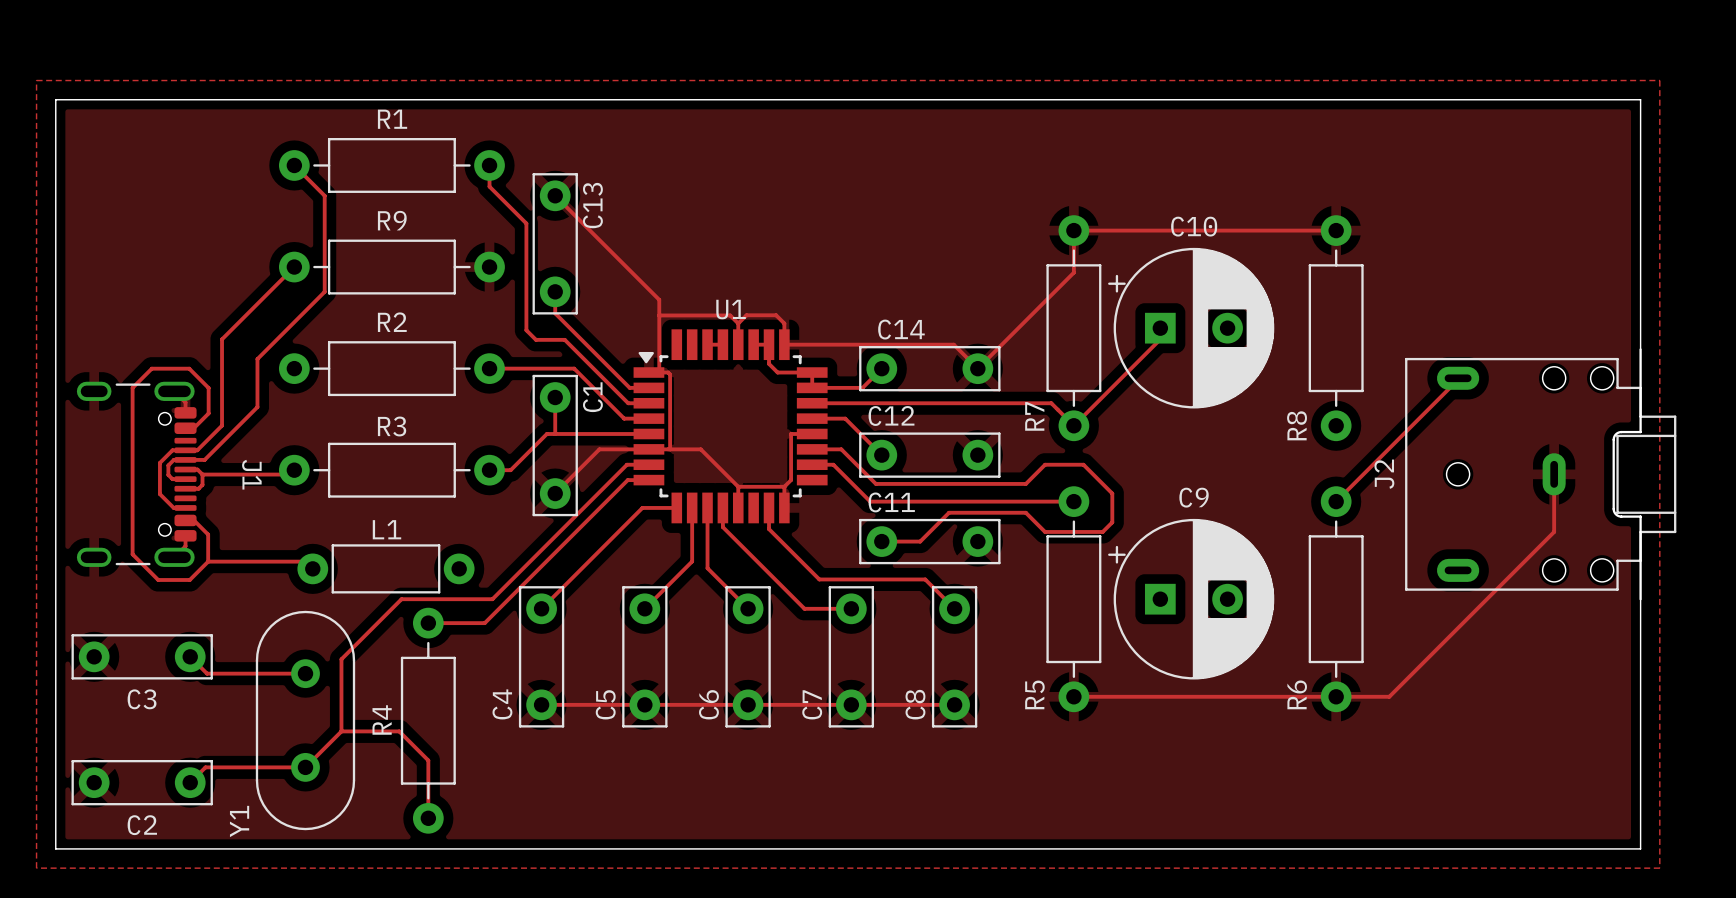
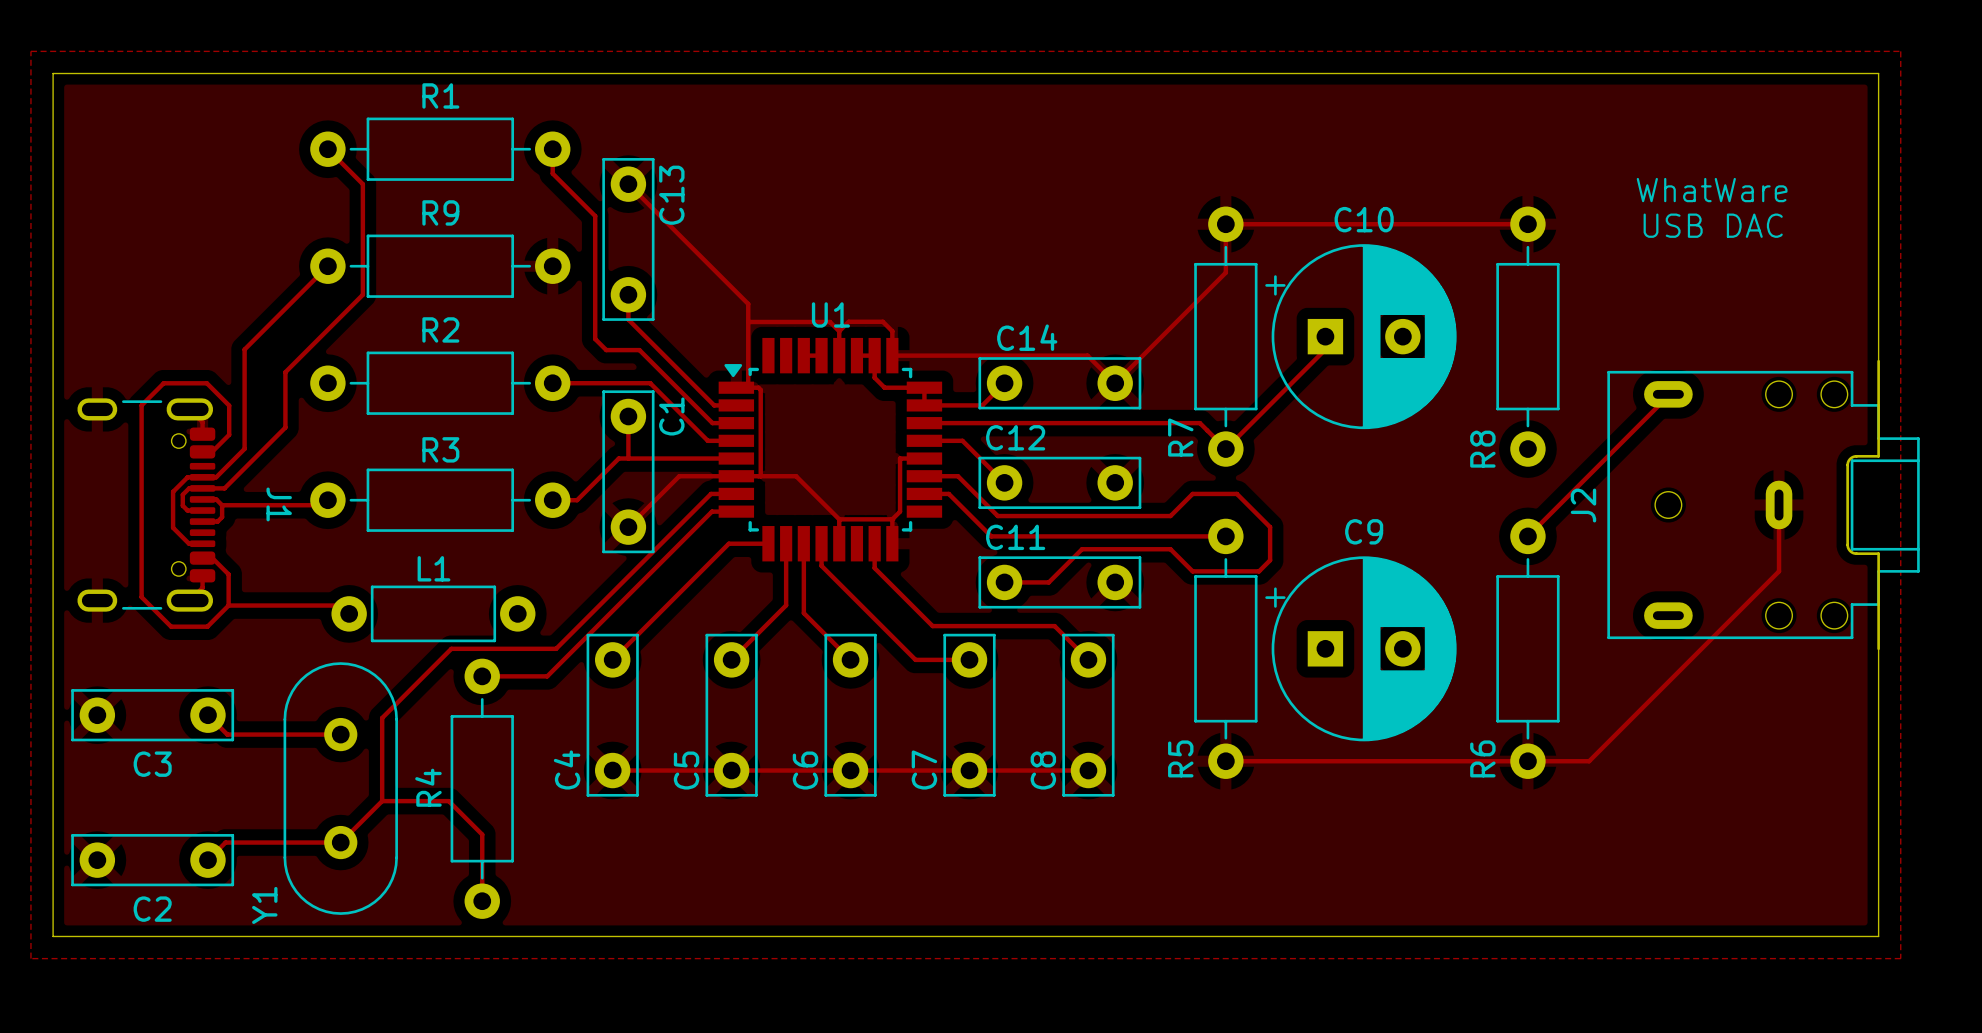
text: none -> WhatWare (1712, 190)
text: none -> USB DAC (1713, 225)

